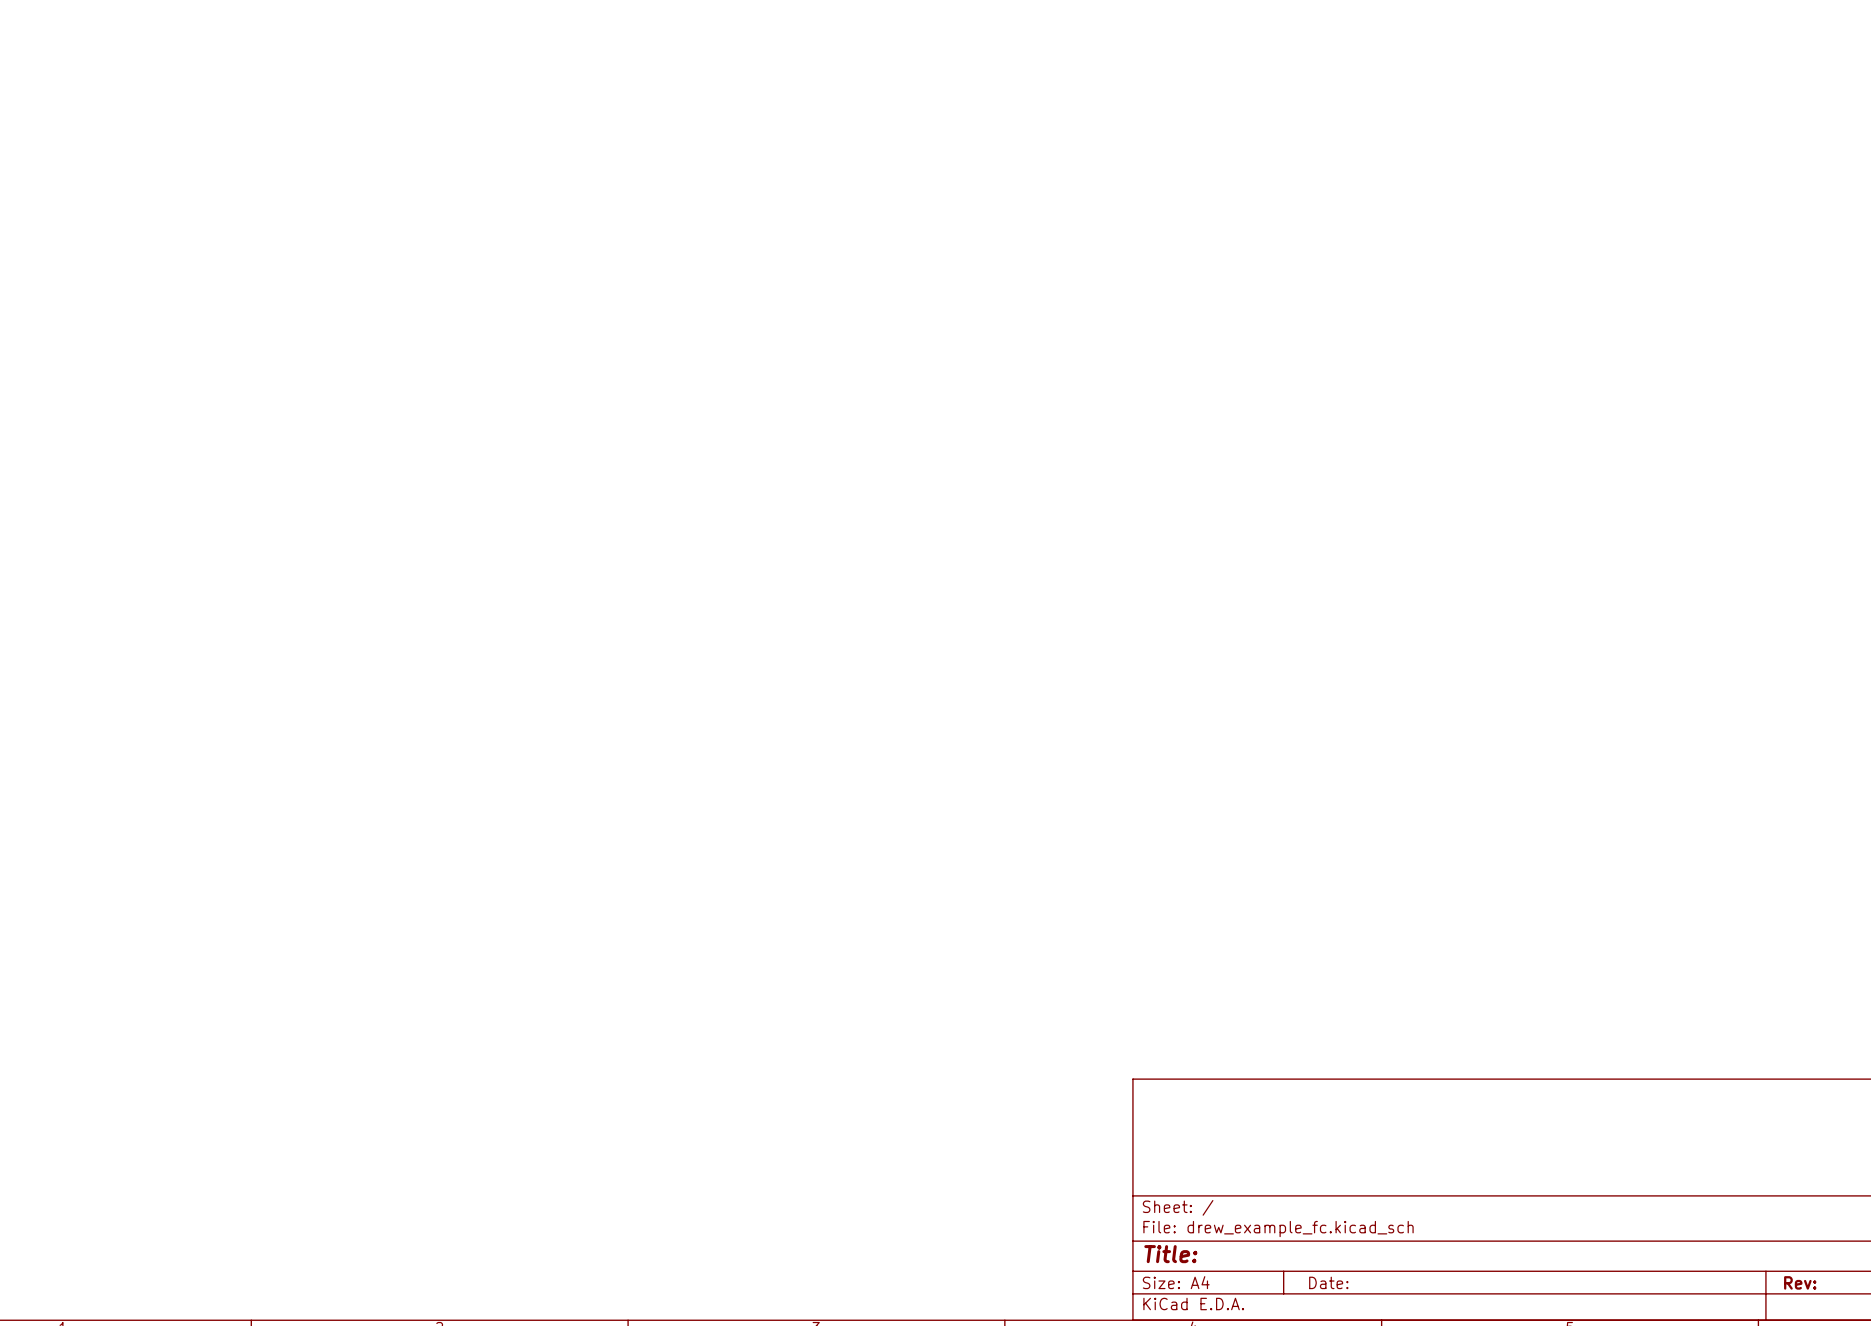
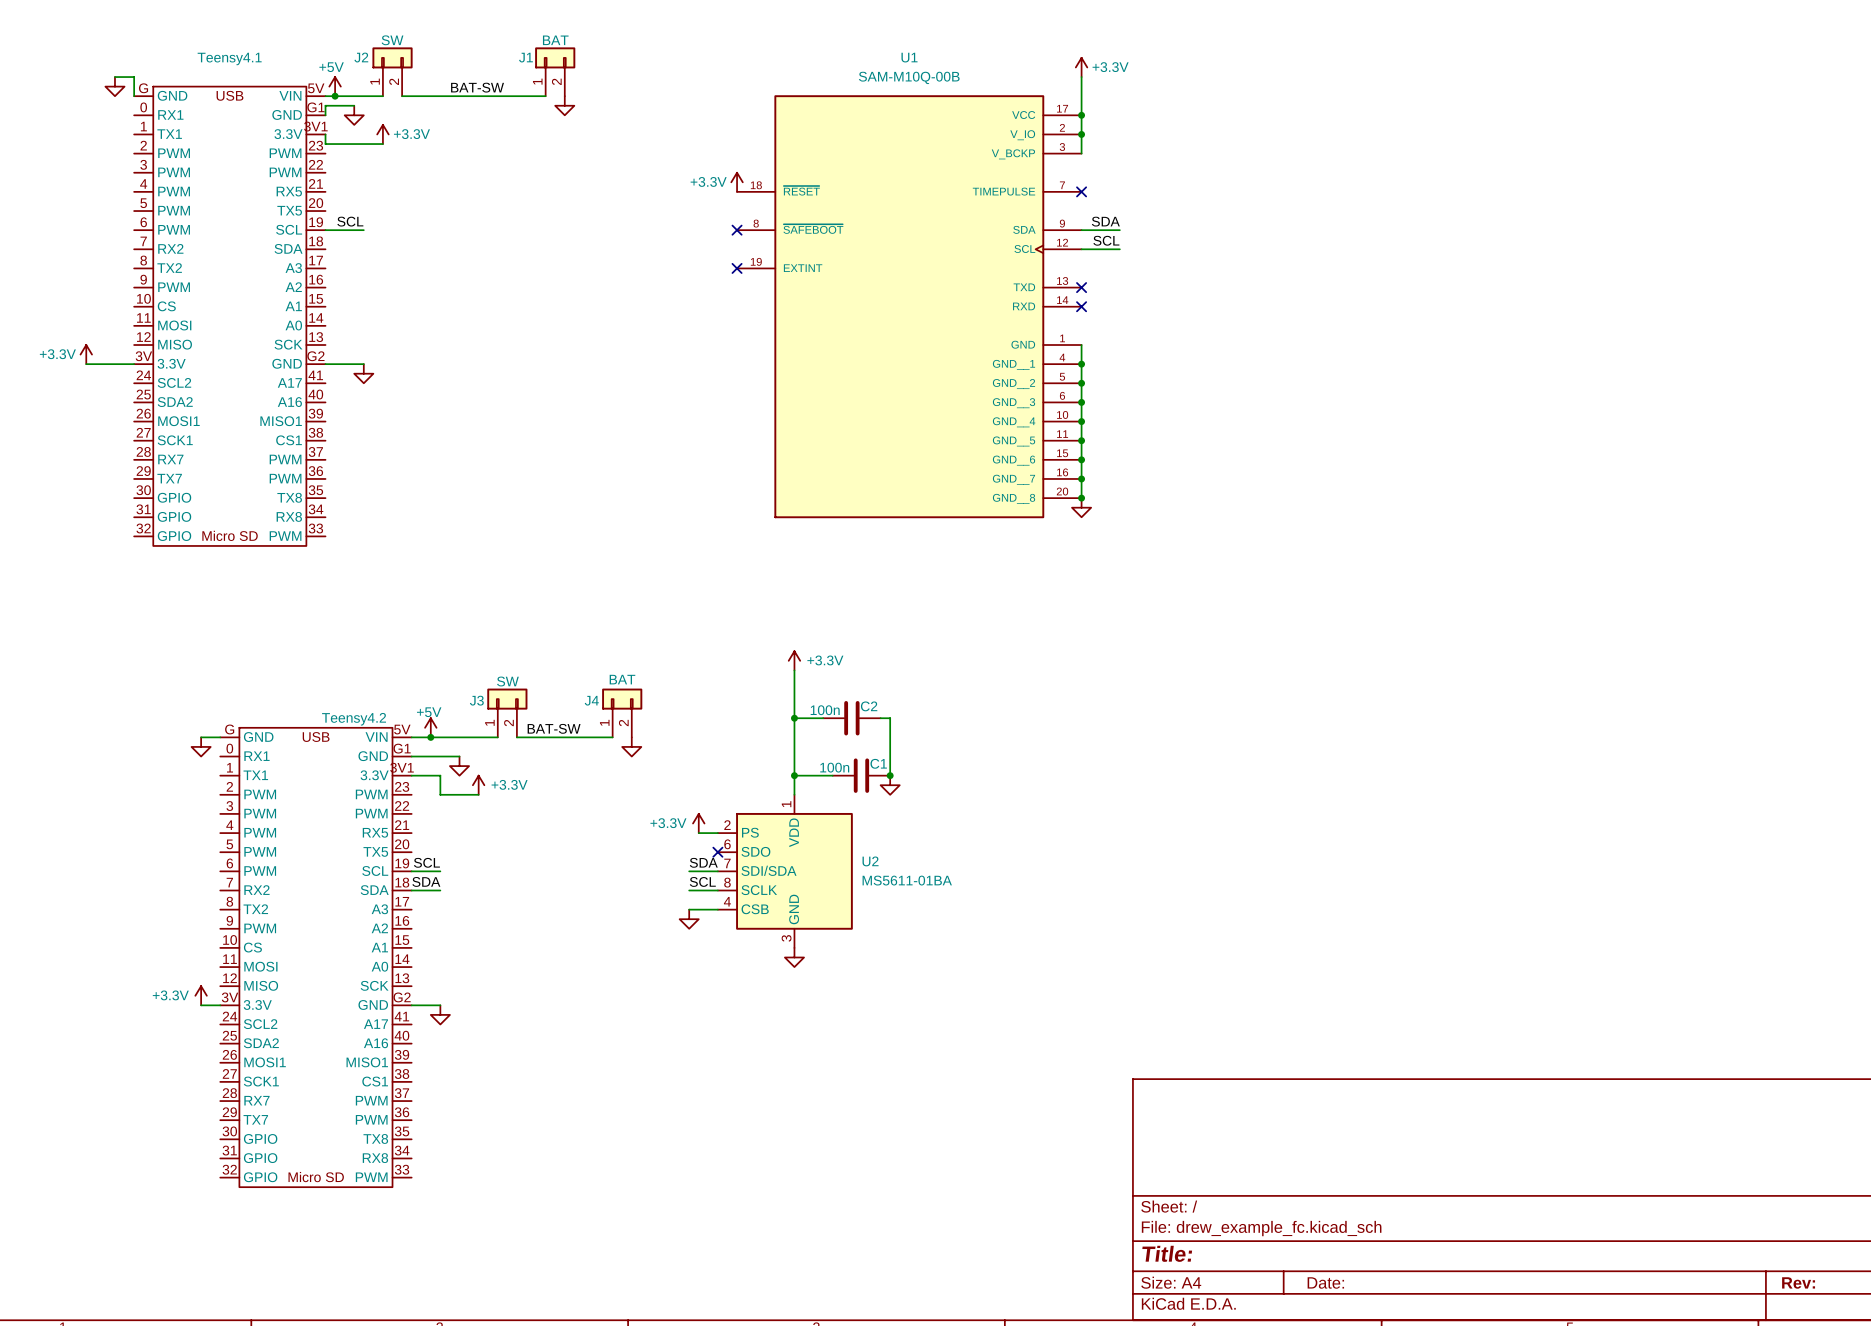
power symbol: none -> +3.3V (1081, 67)
J2: none -> SW (392, 71)
J1: none -> BAT (555, 71)
wire: none -> (114, 77) (134, 77) (134, 96)
wire: none -> (1081, 77) (1081, 153)
power symbol: none -> (114, 86)
power symbol: none -> +5V (335, 86)
label: none -> BAT-SW (477, 87)
wire: none -> (325, 96) (382, 96)
junction: none -> (335, 96)
wire: none -> (402, 96) (545, 96)
wire: none -> (354, 105) (325, 105) (325, 115)
power symbol: none -> (564, 105)
power symbol: none -> (354, 115)
junction: none -> (1081, 115)
wire: none -> (325, 134) (325, 144) (382, 144)
power symbol: none -> +3.3V (382, 134)
junction: none -> (1081, 134)
power symbol: none -> +3.3V (737, 182)
no-connect mark: none -> (1081, 191)
label: none -> SCL (350, 221)
label: none -> SDA (1105, 221)
wire: none -> (325, 230) (363, 230)
no-connect mark: none -> (737, 230)
wire: none -> (1081, 230) (1119, 230)
label: none -> SCL (1106, 240)
wire: none -> (1081, 249) (1119, 249)
no-connect mark: none -> (737, 268)
no-connect mark: none -> (1081, 287)
U1: none -> SAM-M10Q-00B (909, 306)
no-connect mark: none -> (1081, 306)
Teensy4.1: none -> (229, 316)
wire: none -> (1081, 345) (1081, 498)
power symbol: none -> +3.3V (86, 354)
wire: none -> (86, 364) (134, 364)
wire: none -> (325, 364) (363, 364)
junction: none -> (1081, 364)
power symbol: none -> (363, 373)
junction: none -> (1081, 383)
junction: none -> (1081, 402)
junction: none -> (1081, 421)
junction: none -> (1081, 440)
junction: none -> (1081, 459)
junction: none -> (1081, 478)
junction: none -> (1081, 498)
power symbol: none -> (1081, 507)
power symbol: none -> +3.3V (794, 660)
wire: none -> (794, 670) (794, 794)
J3: none -> SW (507, 712)
J4: none -> BAT (622, 712)
wire: none -> (794, 718) (823, 718)
junction: none -> (794, 718)
C2: none -> 100n (851, 718)
wire: none -> (880, 718) (890, 718) (890, 775)
power symbol: none -> +5V (430, 727)
label: none -> BAT-SW (554, 728)
wire: none -> (201, 737) (220, 737)
wire: none -> (411, 737) (497, 737)
junction: none -> (430, 737)
wire: none -> (516, 737) (612, 737)
power symbol: none -> (201, 746)
power symbol: none -> (631, 746)
wire: none -> (411, 756) (459, 756)
power symbol: none -> (459, 766)
wire: none -> (411, 775) (440, 775) (440, 794) (478, 794)
wire: none -> (794, 775) (832, 775)
junction: none -> (794, 775)
C1: none -> 100n (861, 775)
junction: none -> (890, 775)
power symbol: none -> +3.3V (478, 785)
power symbol: none -> (890, 785)
power symbol: none -> +3.3V (698, 823)
wire: none -> (698, 833) (717, 833)
no-connect mark: none -> (717, 852)
label: none -> SCL (426, 862)
label: none -> SDA (703, 862)
wire: none -> (411, 871) (440, 871)
wire: none -> (689, 871) (717, 871)
U2: none -> MS5611-01BA (785, 871)
label: none -> SDA (426, 881)
label: none -> SCL (702, 881)
wire: none -> (411, 890) (440, 890)
wire: none -> (689, 890) (717, 890)
wire: none -> (689, 909) (717, 909)
power symbol: none -> (689, 919)
Teensy4.2: none -> (315, 957)
power symbol: none -> (794, 957)
power symbol: none -> +3.3V (201, 995)
wire: none -> (201, 1005) (220, 1005)
wire: none -> (411, 1005) (440, 1005)
power symbol: none -> (440, 1014)

